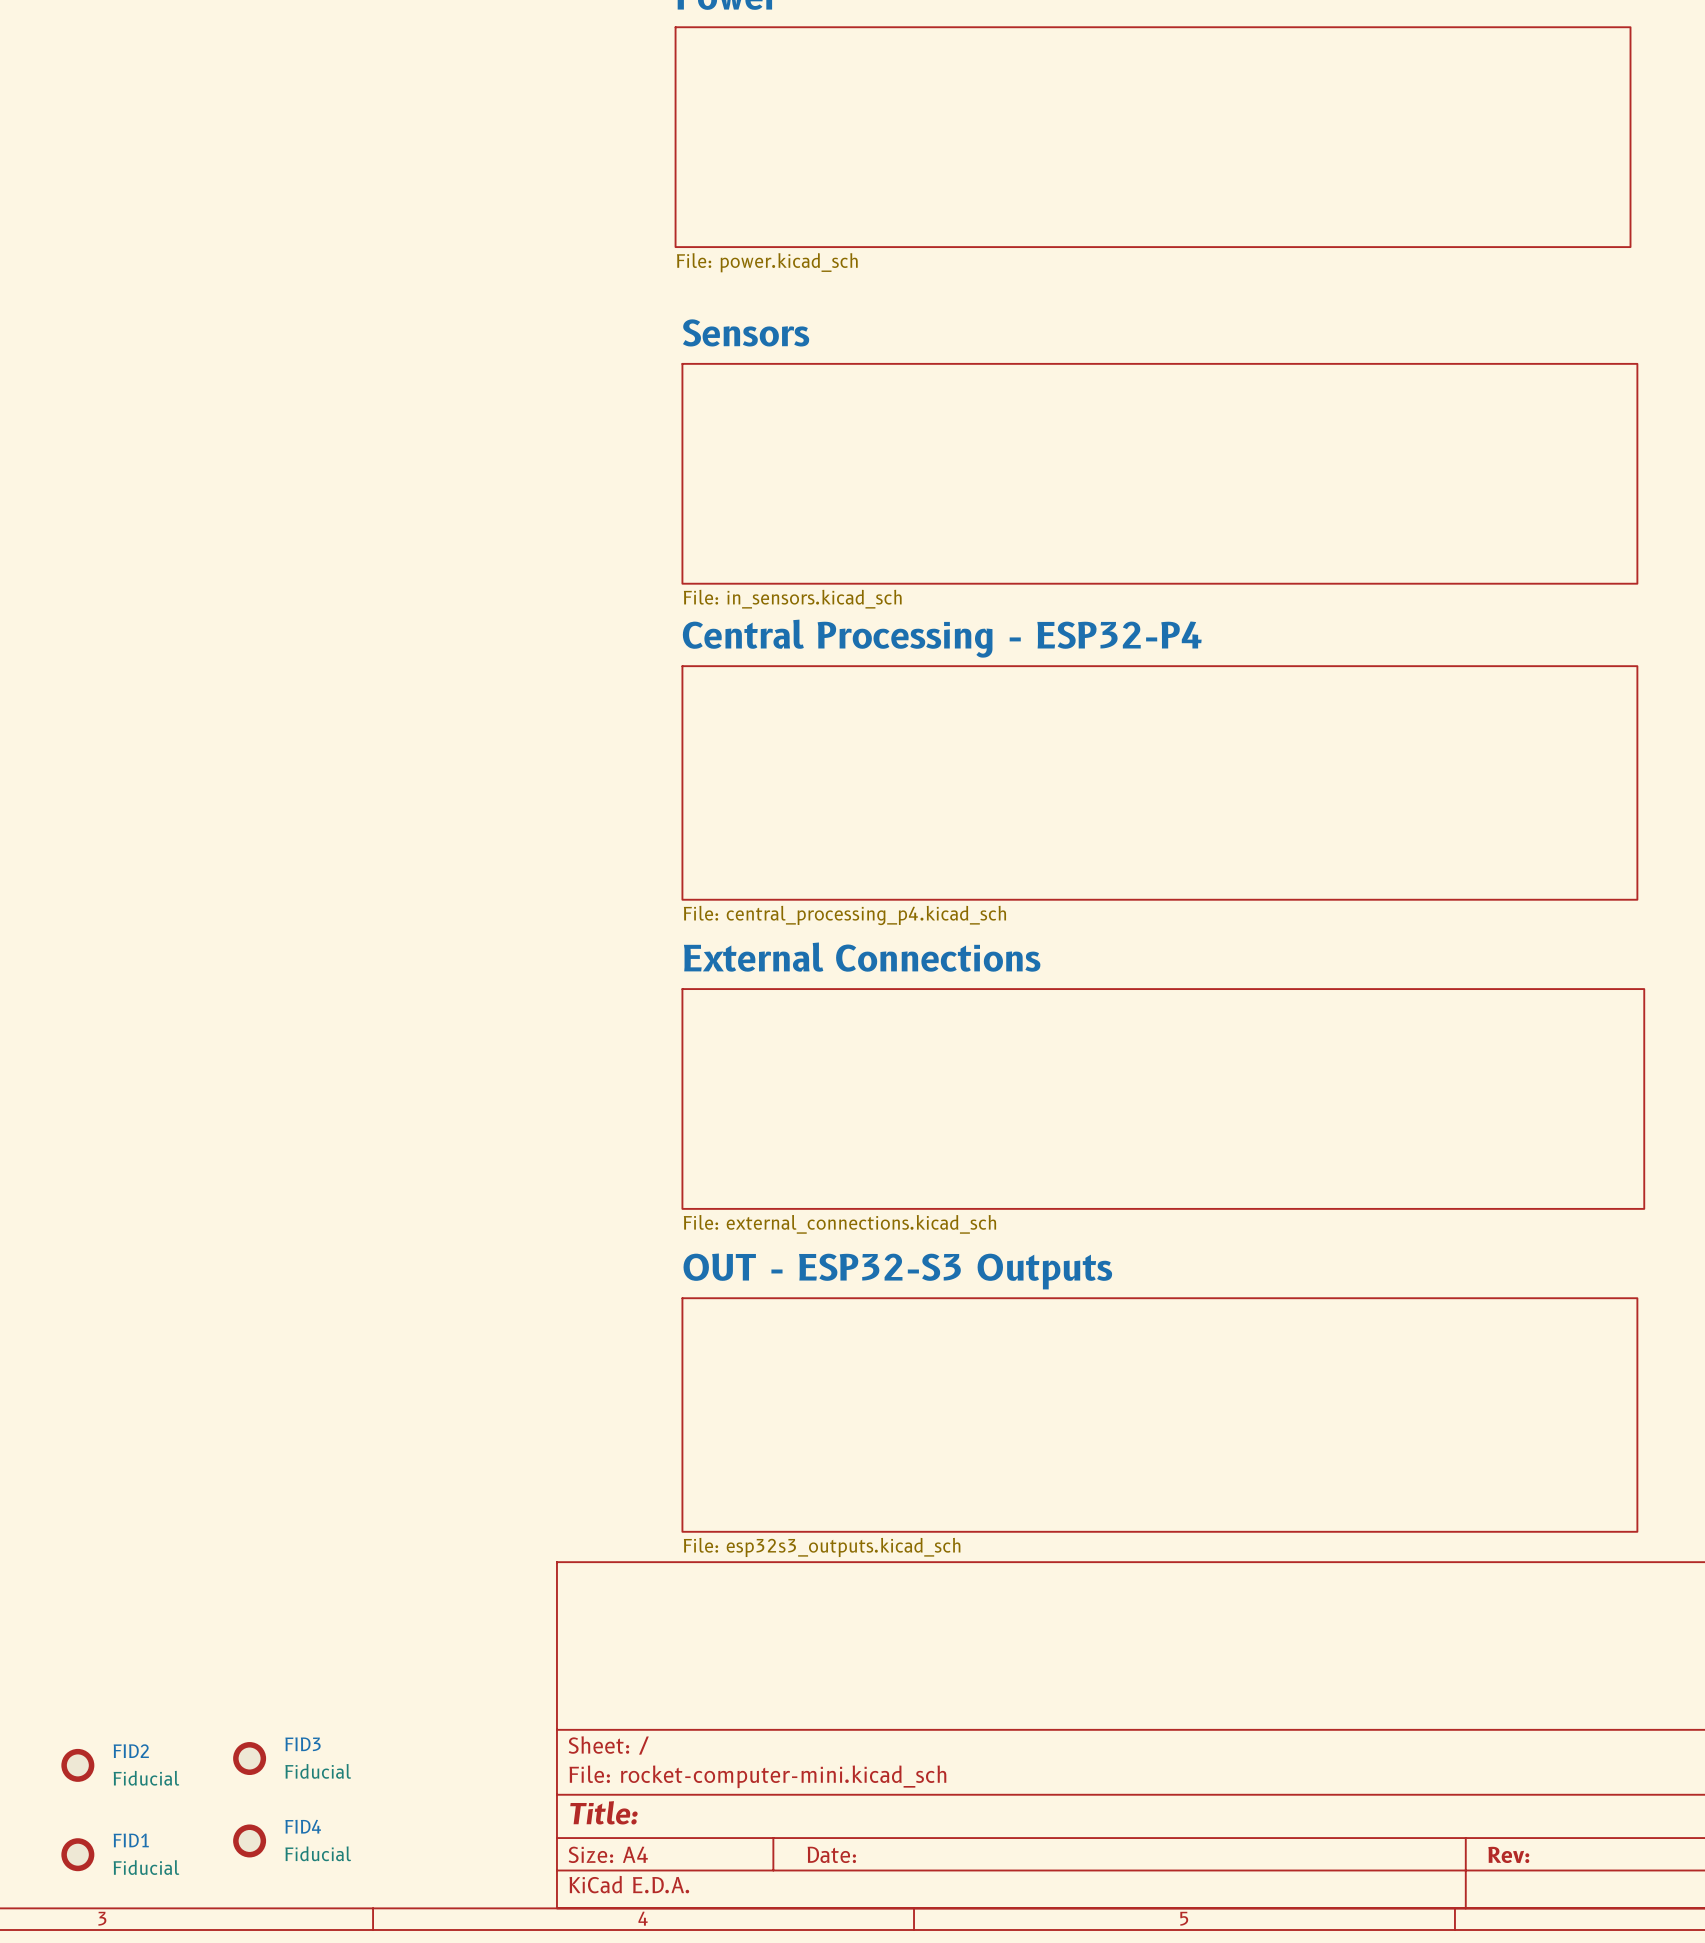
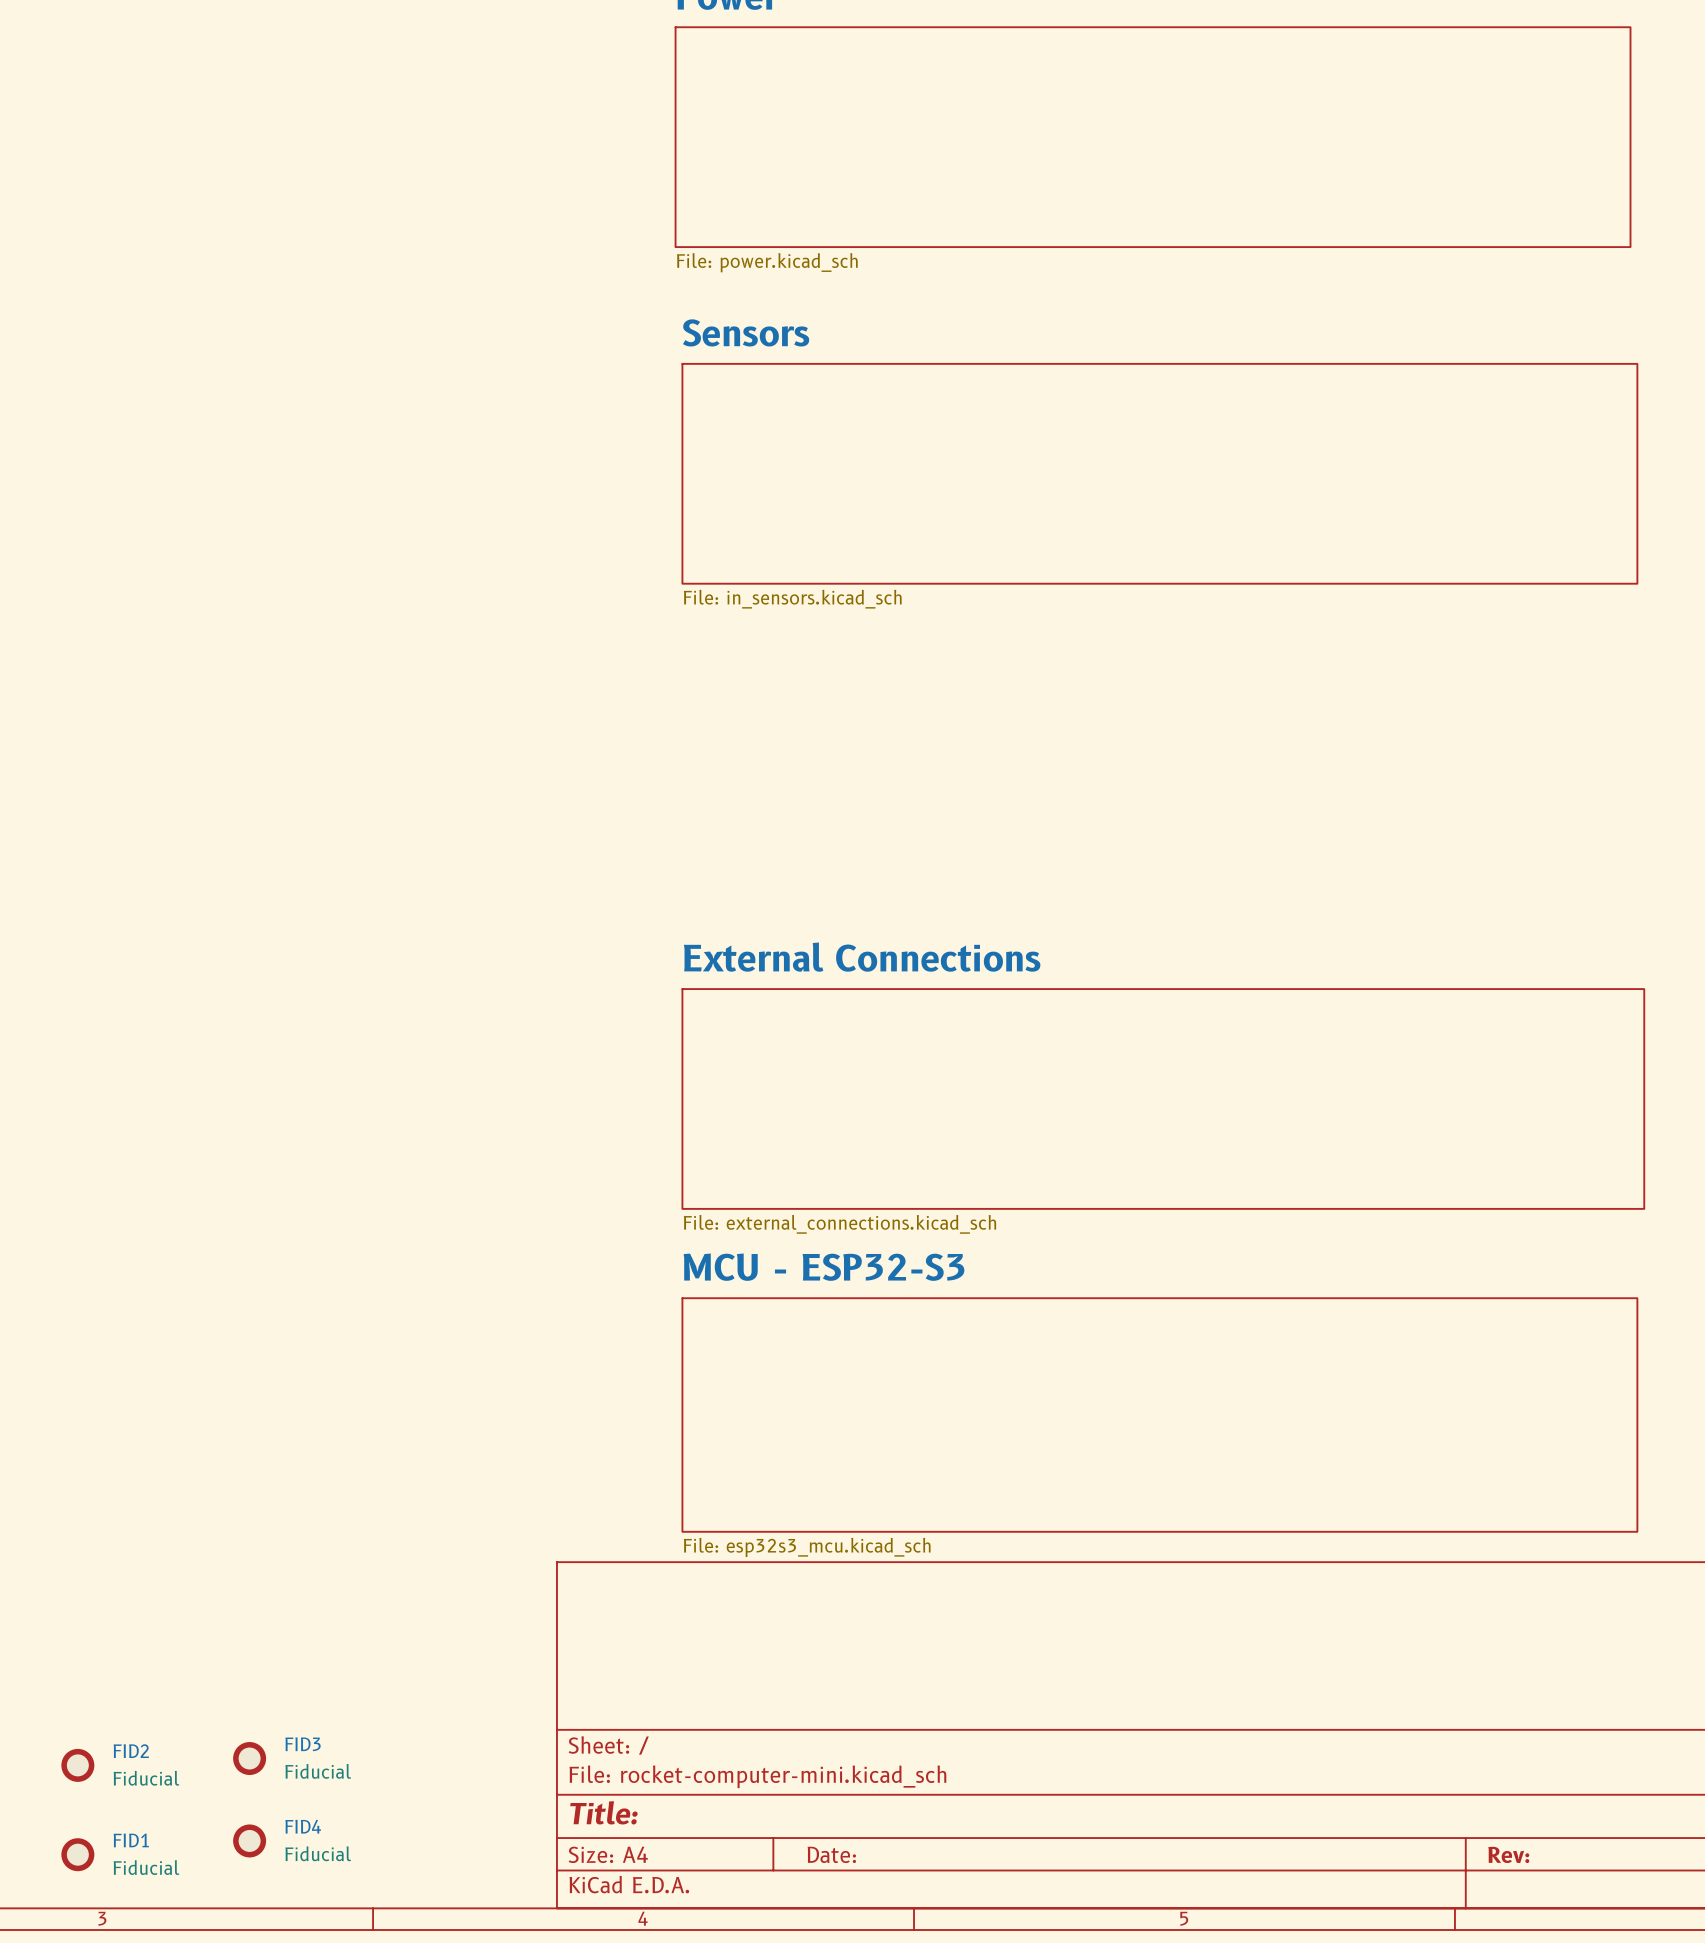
sheet Central Processing - ESP32-P4: File: central_processing_p4.kicad_sch (1159, 782) -> none
sheet OUT - ESP32-S3 Outputs name: OUT - ESP32-S3 Outputs (897, 1271) -> MCU - ESP32-S3 (824, 1267)
sheet OUT - ESP32-S3 Outputs value: File: esp32s3_outputs.kicad_sch (822, 1547) -> File: esp32s3_mcu.kicad_sch (807, 1547)

